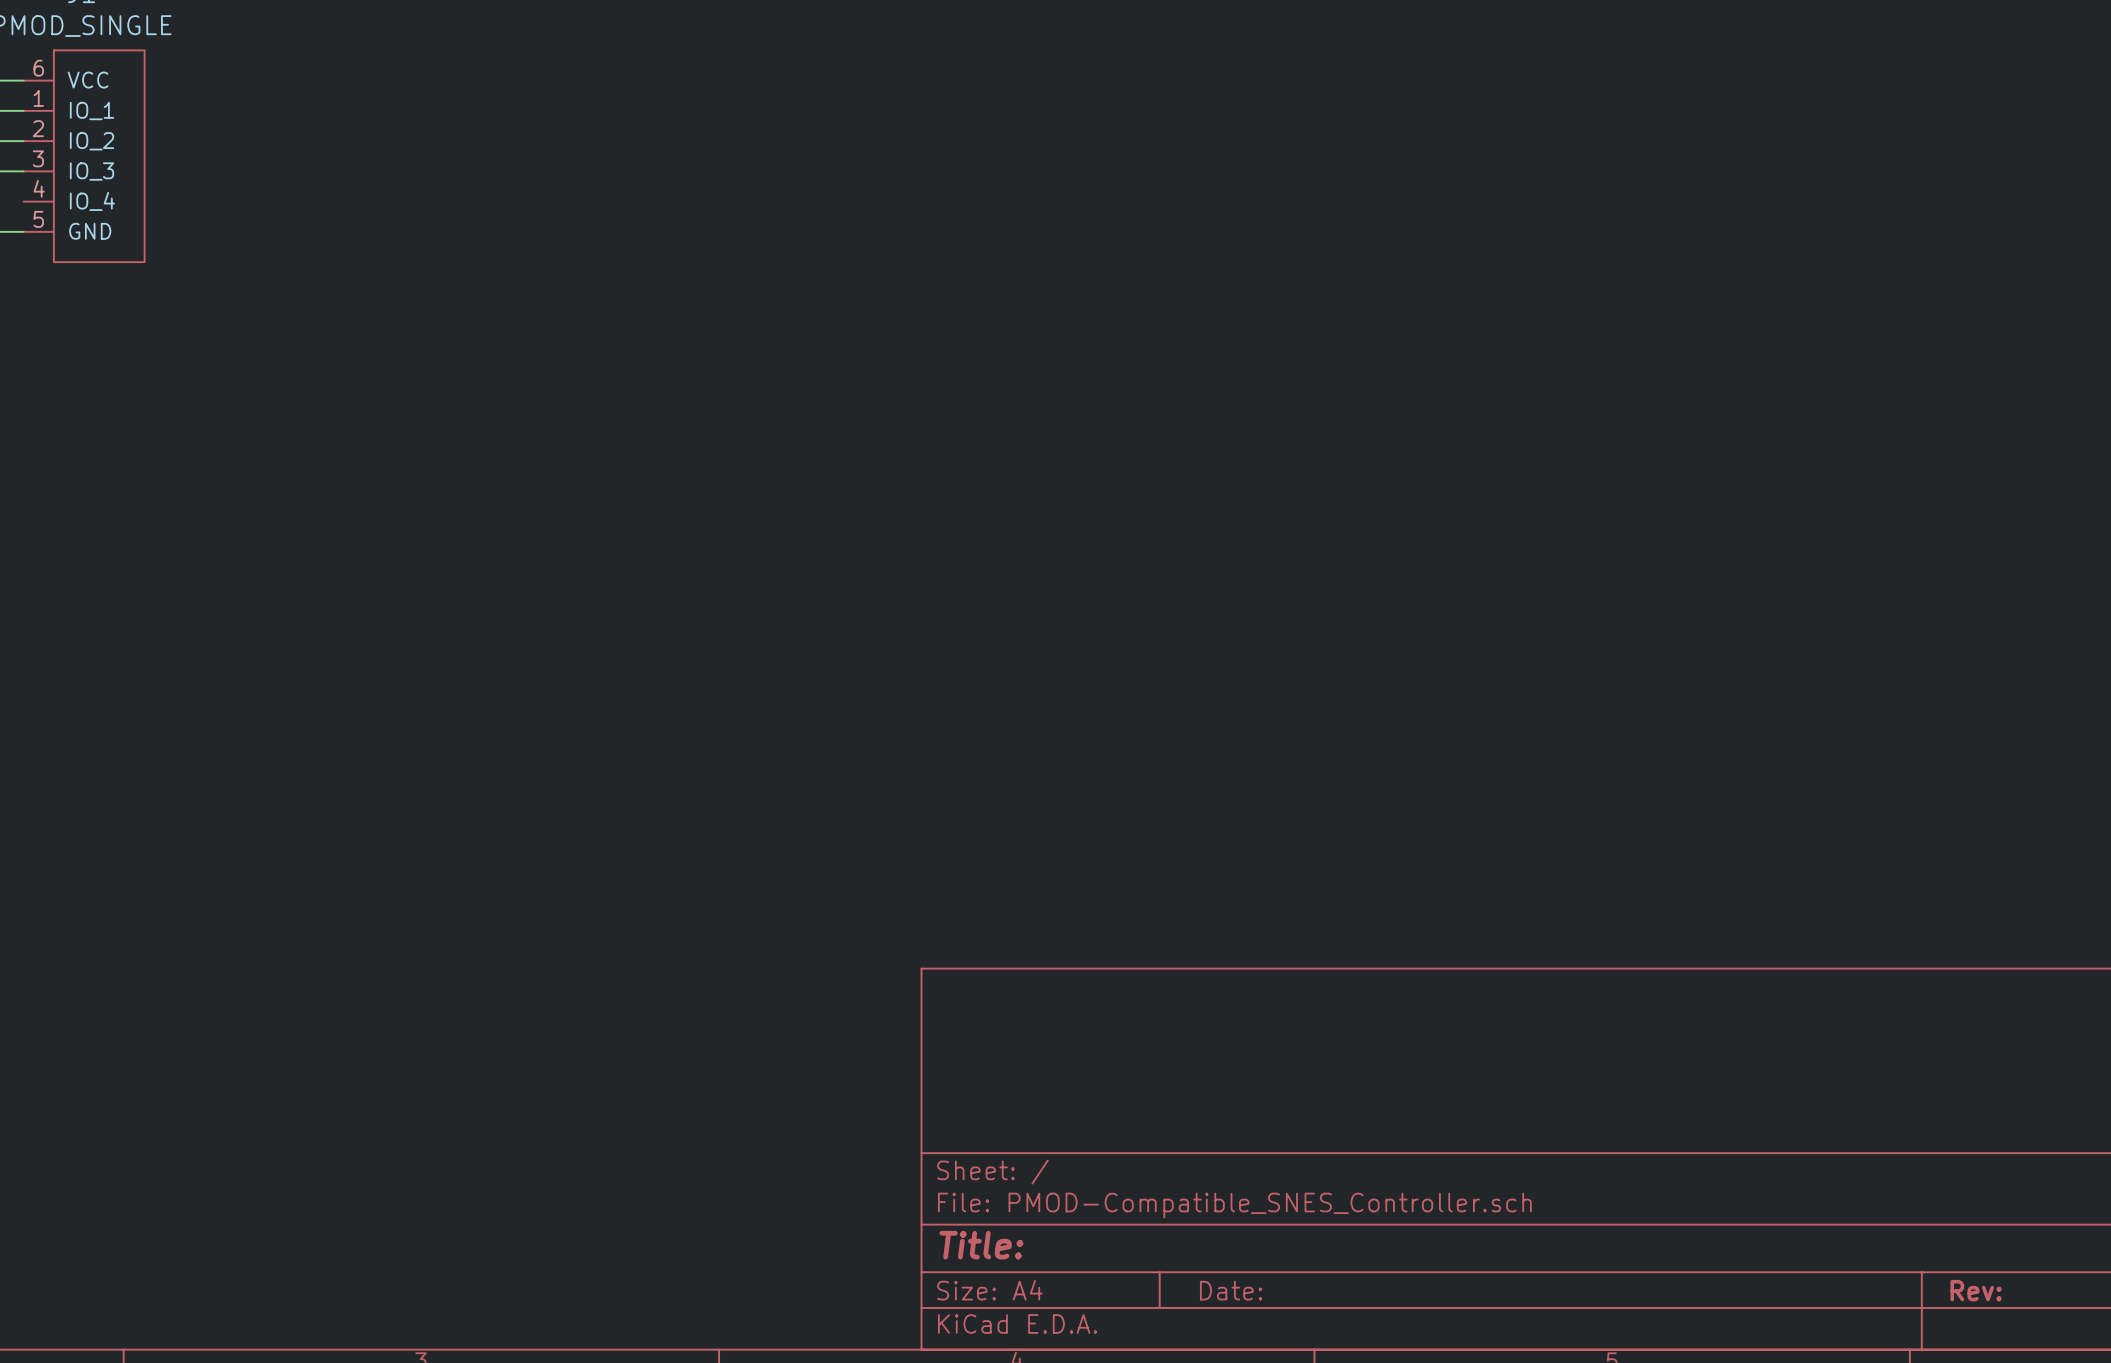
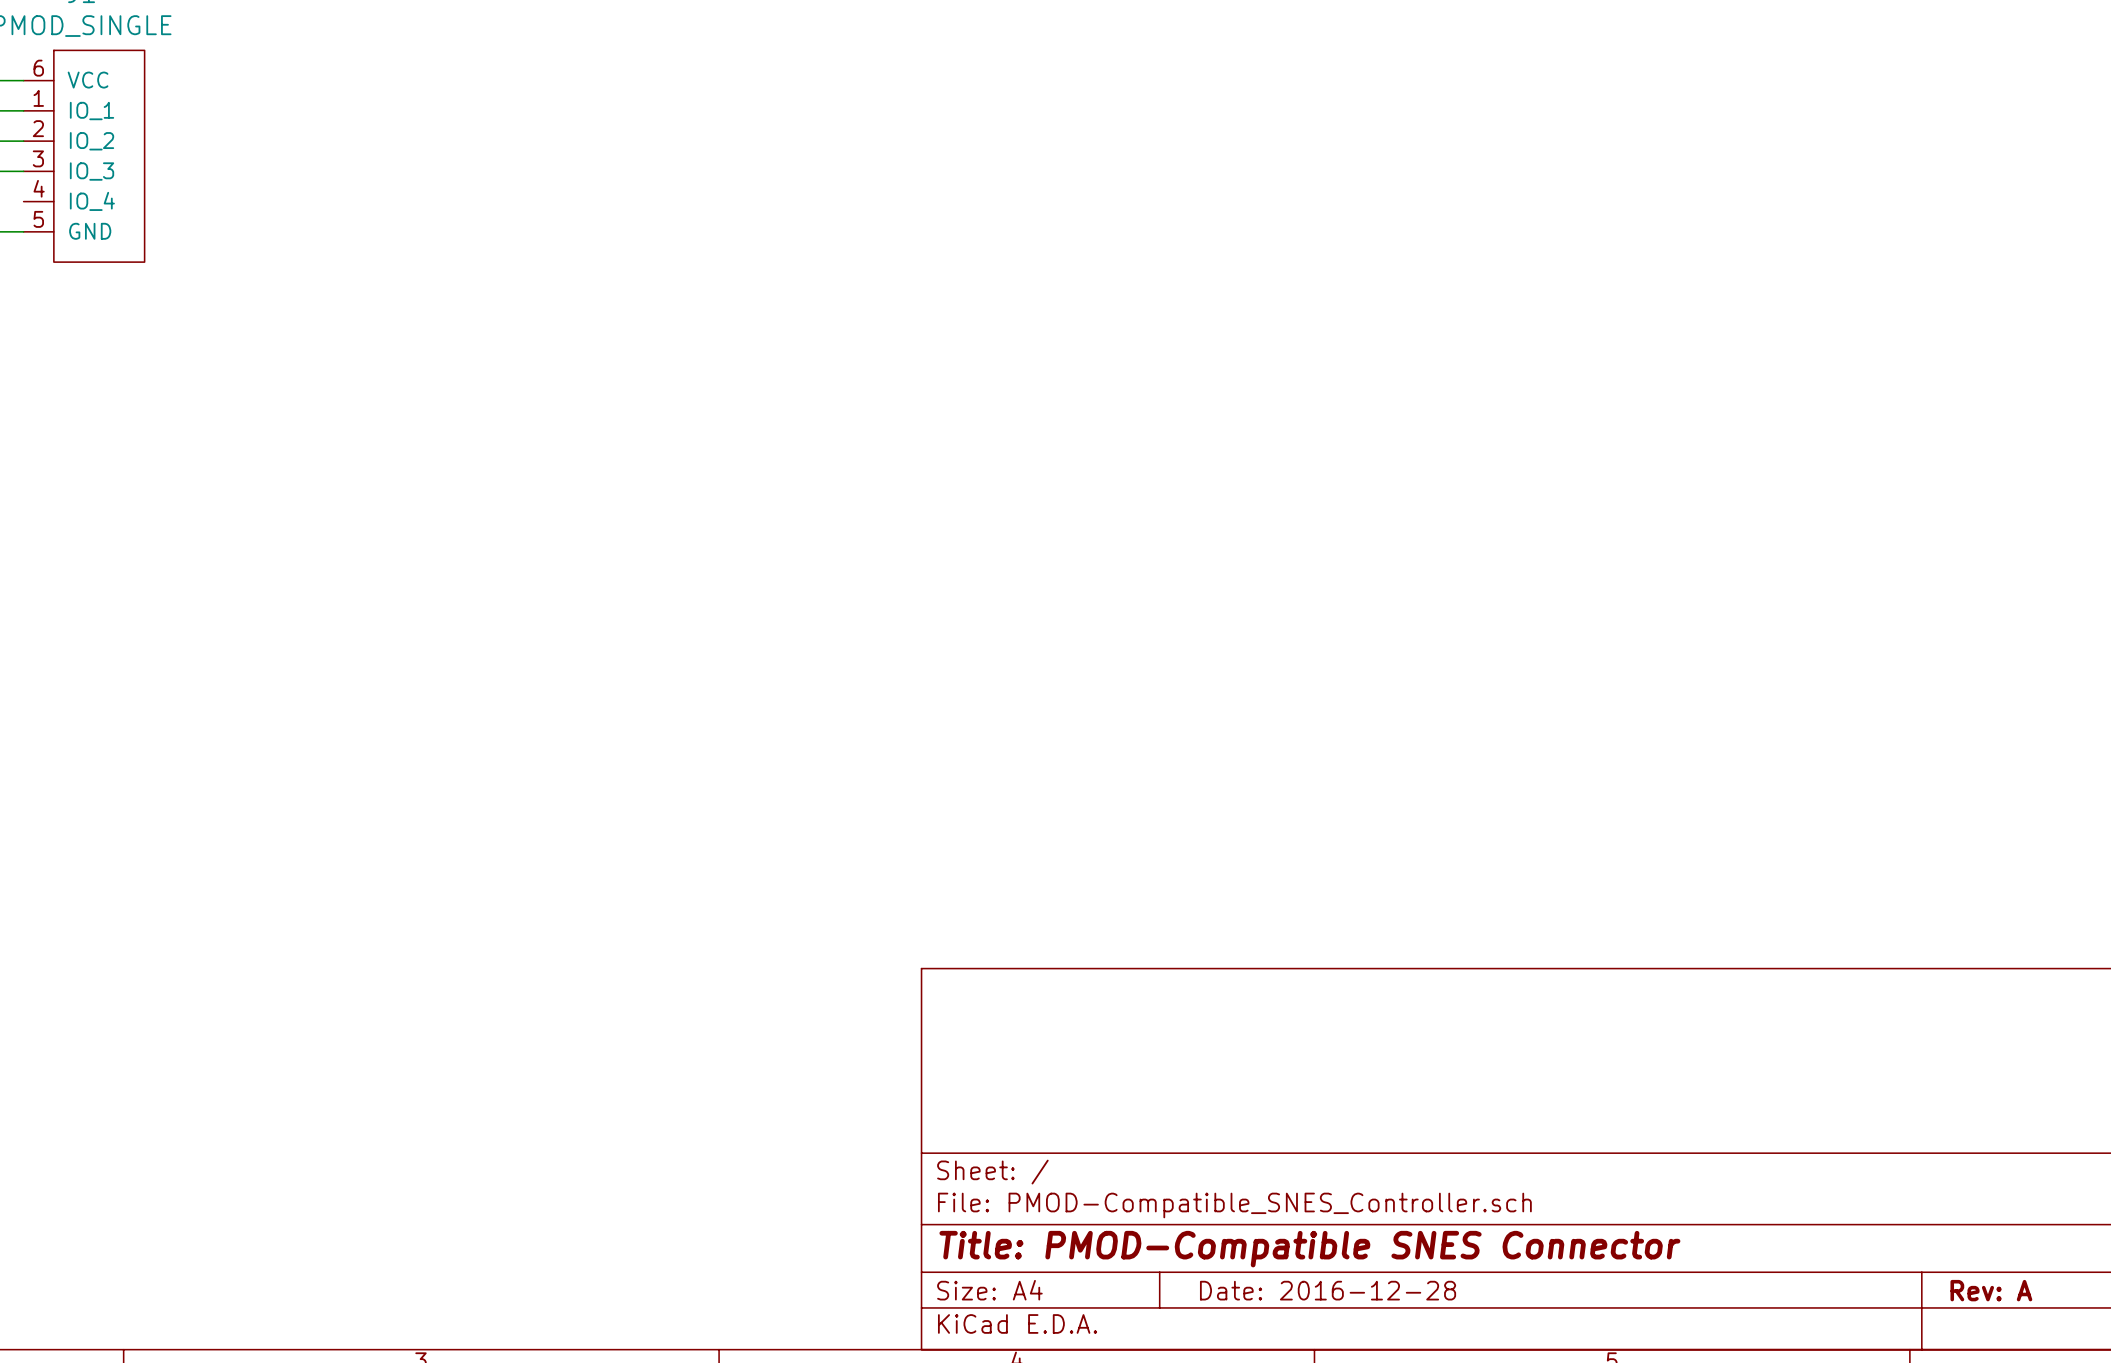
title block: Title: (981, 1245) -> Title: PMOD-Compatible SNES Connector (1309, 1249)
title block: Date: (1231, 1290) -> Date: 2016-12-28 (1328, 1290)
title block: Rev: (1976, 1290) -> Rev: A (1991, 1290)

